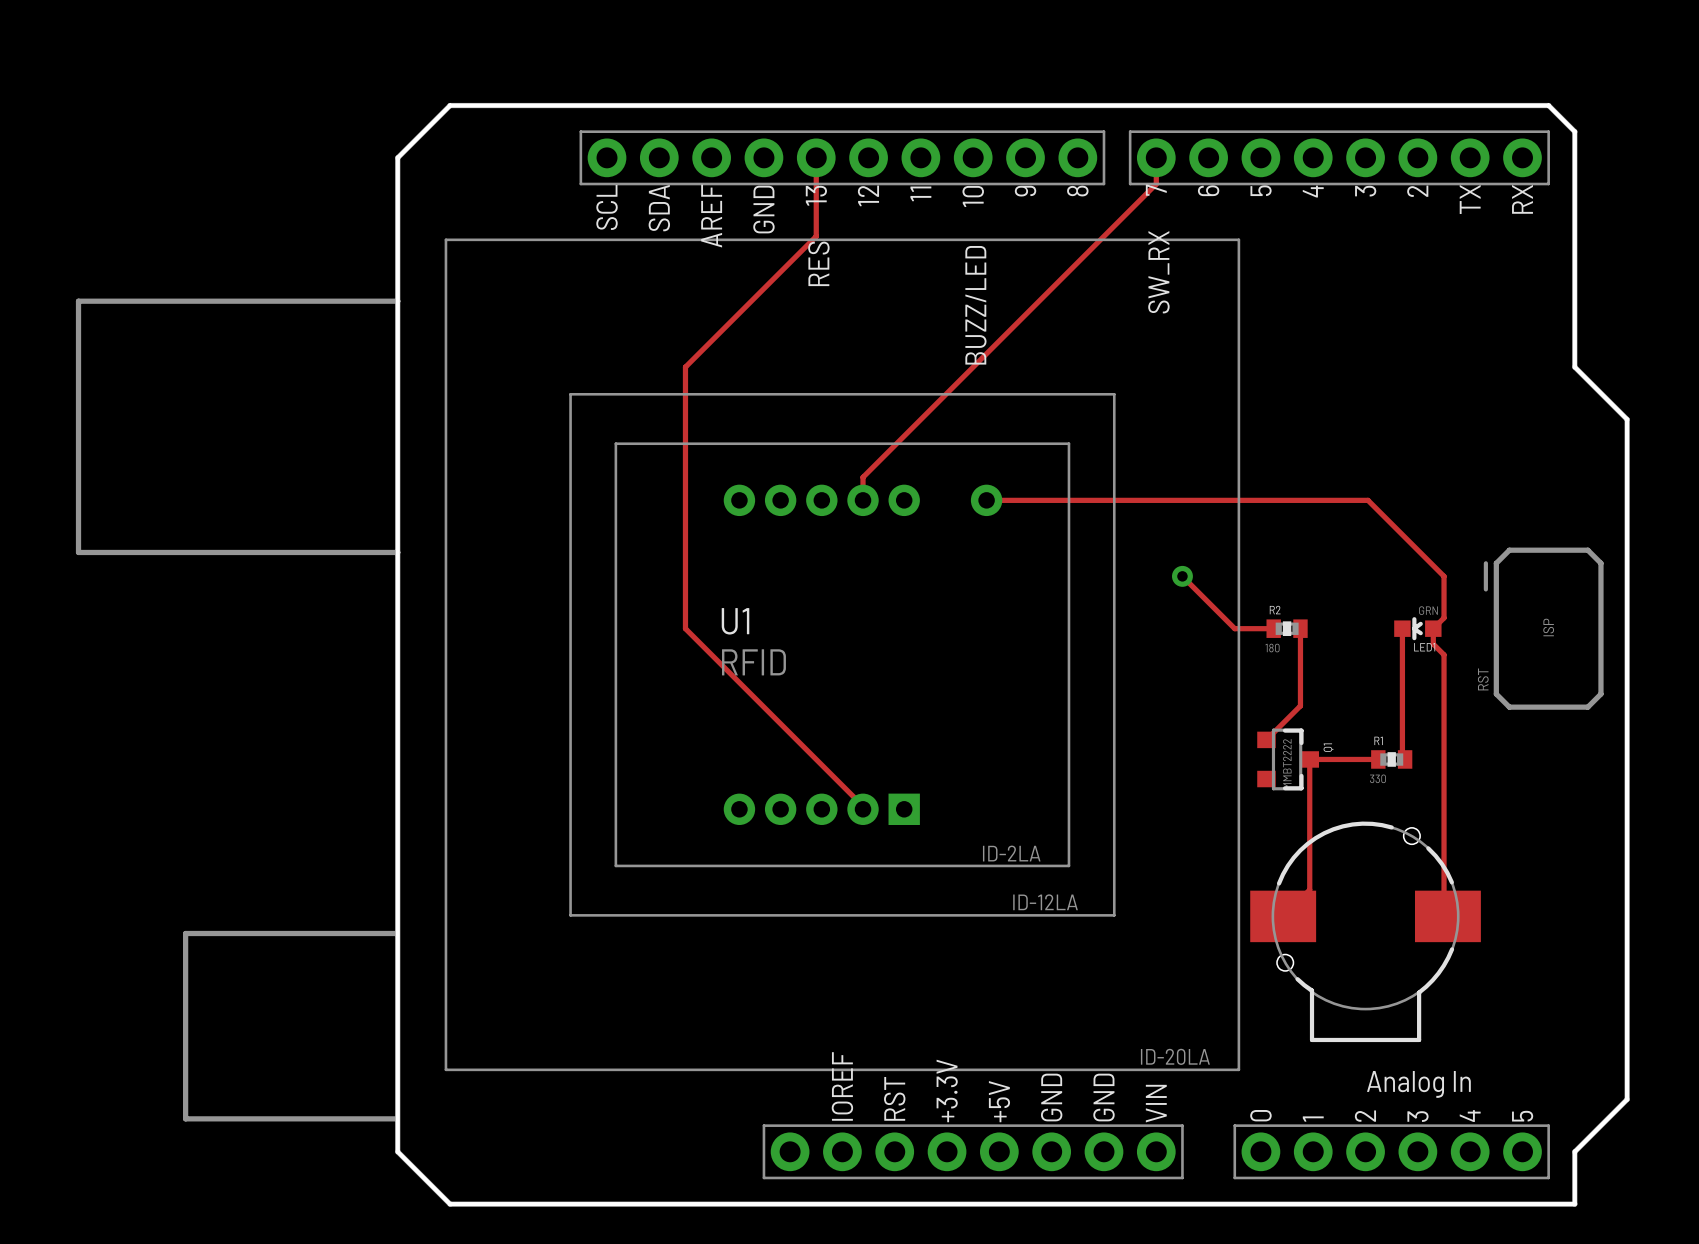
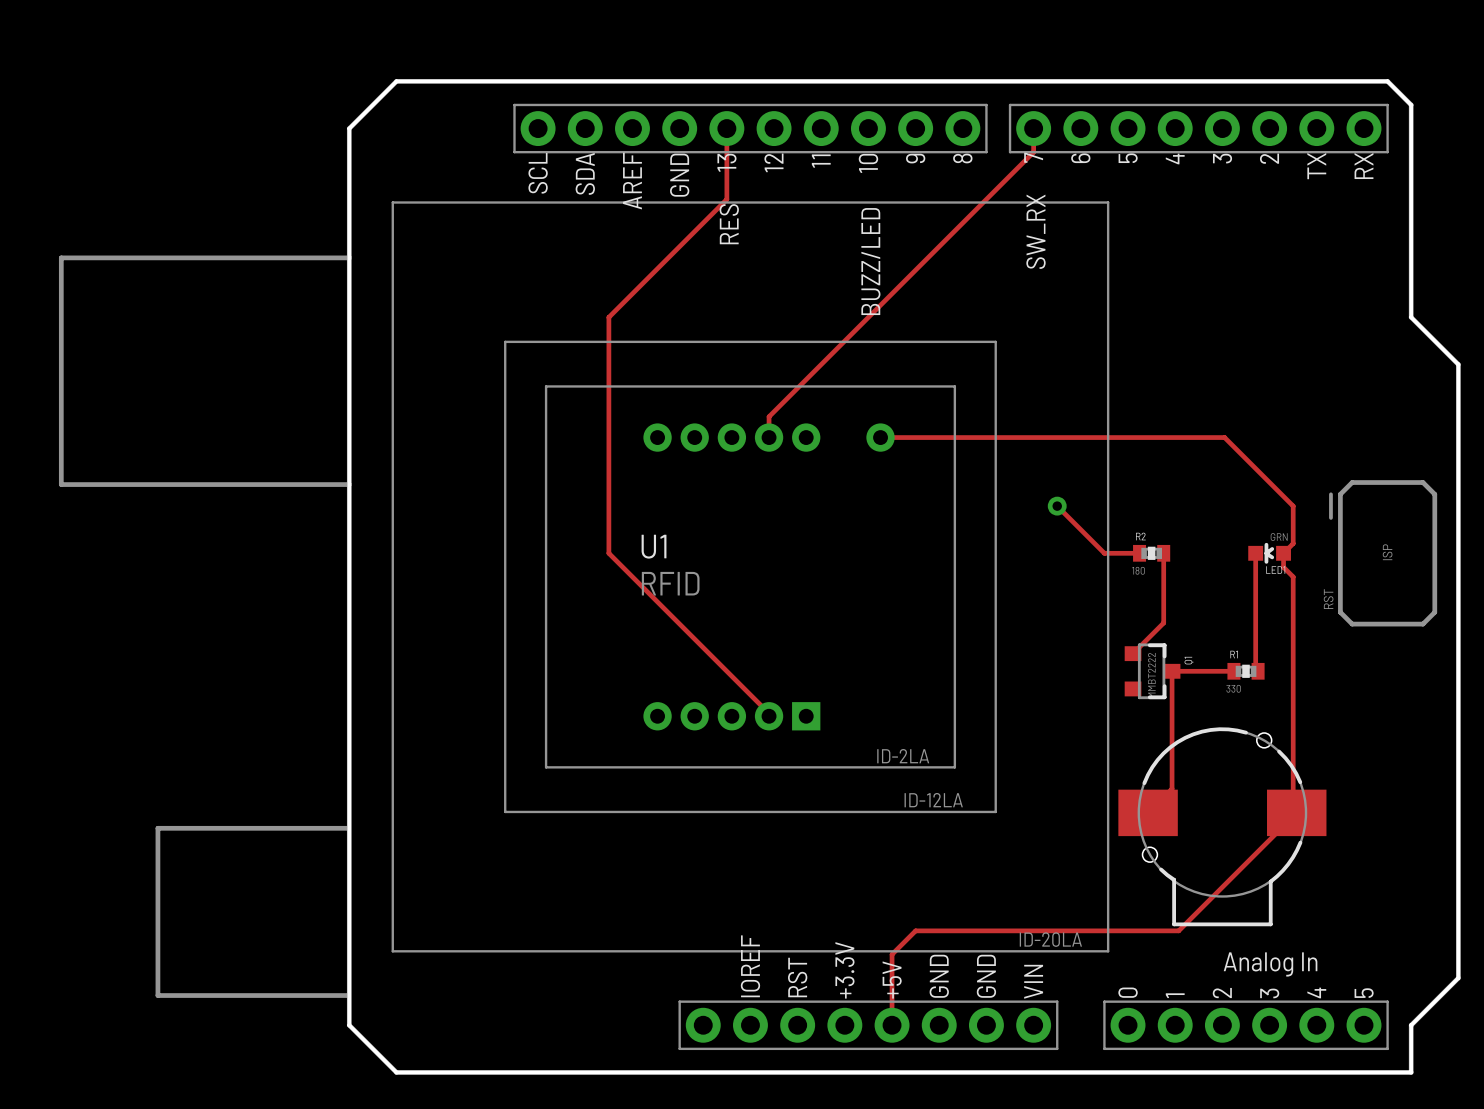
track: none -> (1296, 812) (1178, 930) (915, 930) (892, 954) (892, 1025)

